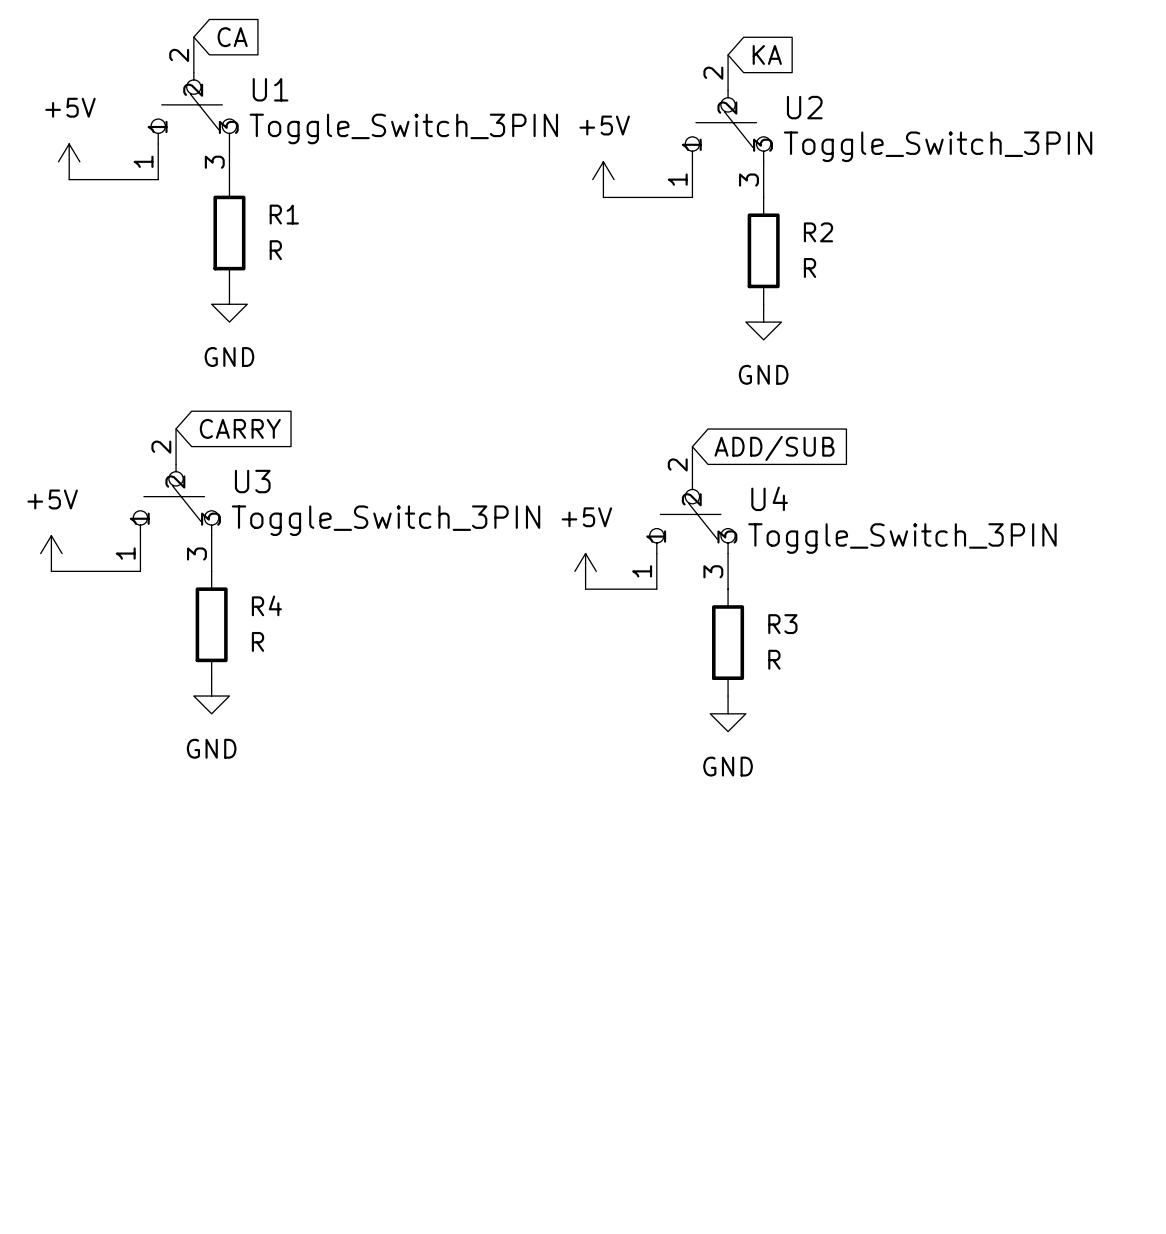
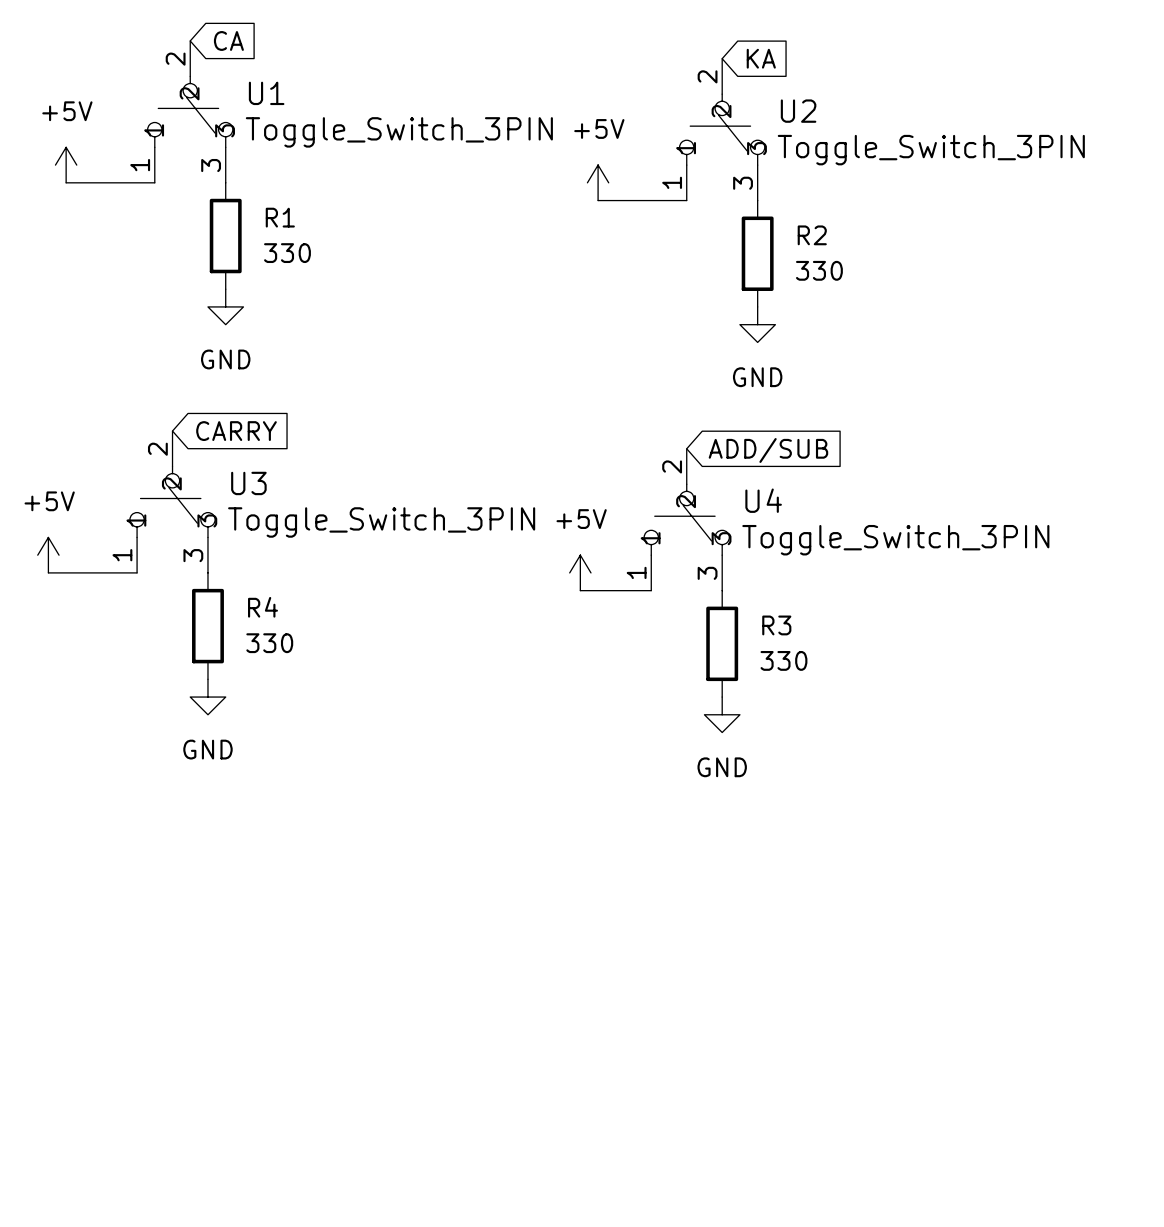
R1 value: R (275, 250) -> 330 (287, 253)
R2 value: R (810, 267) -> 330 (819, 270)
R4 value: R (258, 641) -> 330 (269, 643)
R3 value: R (774, 659) -> 330 (783, 660)

